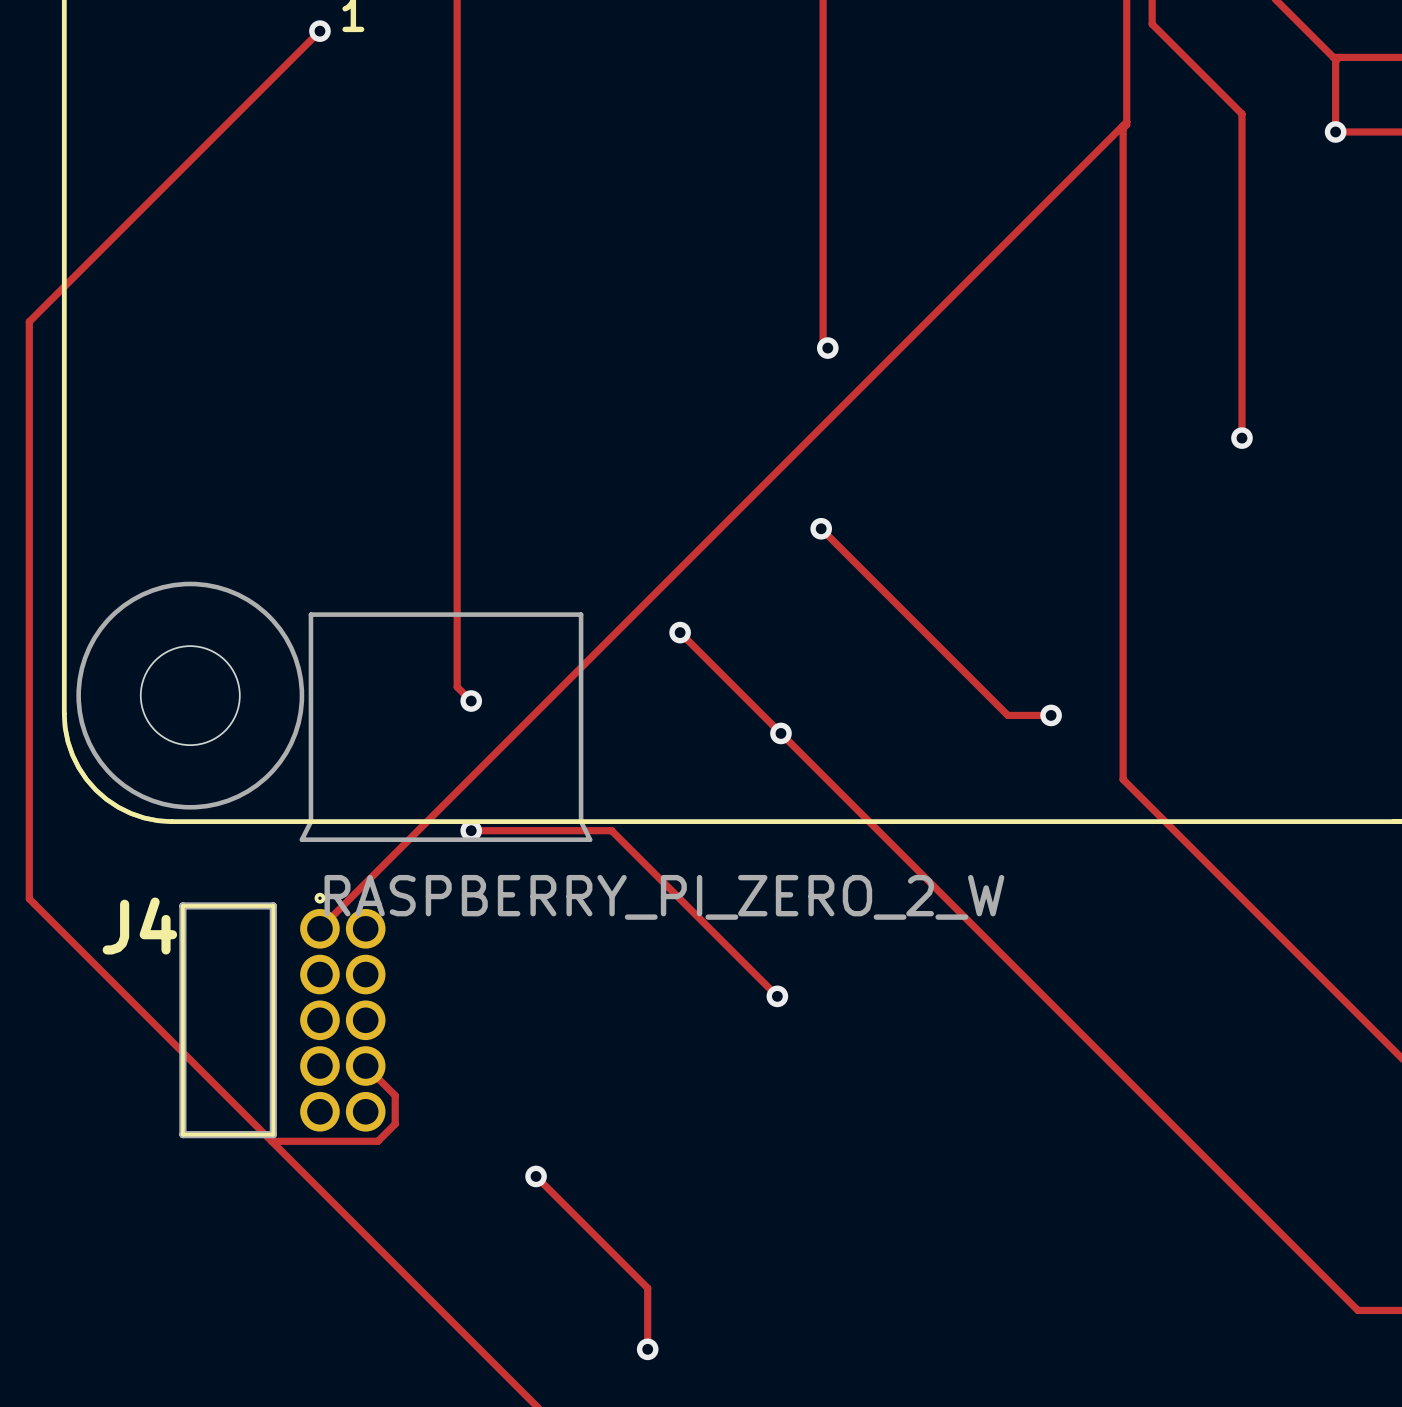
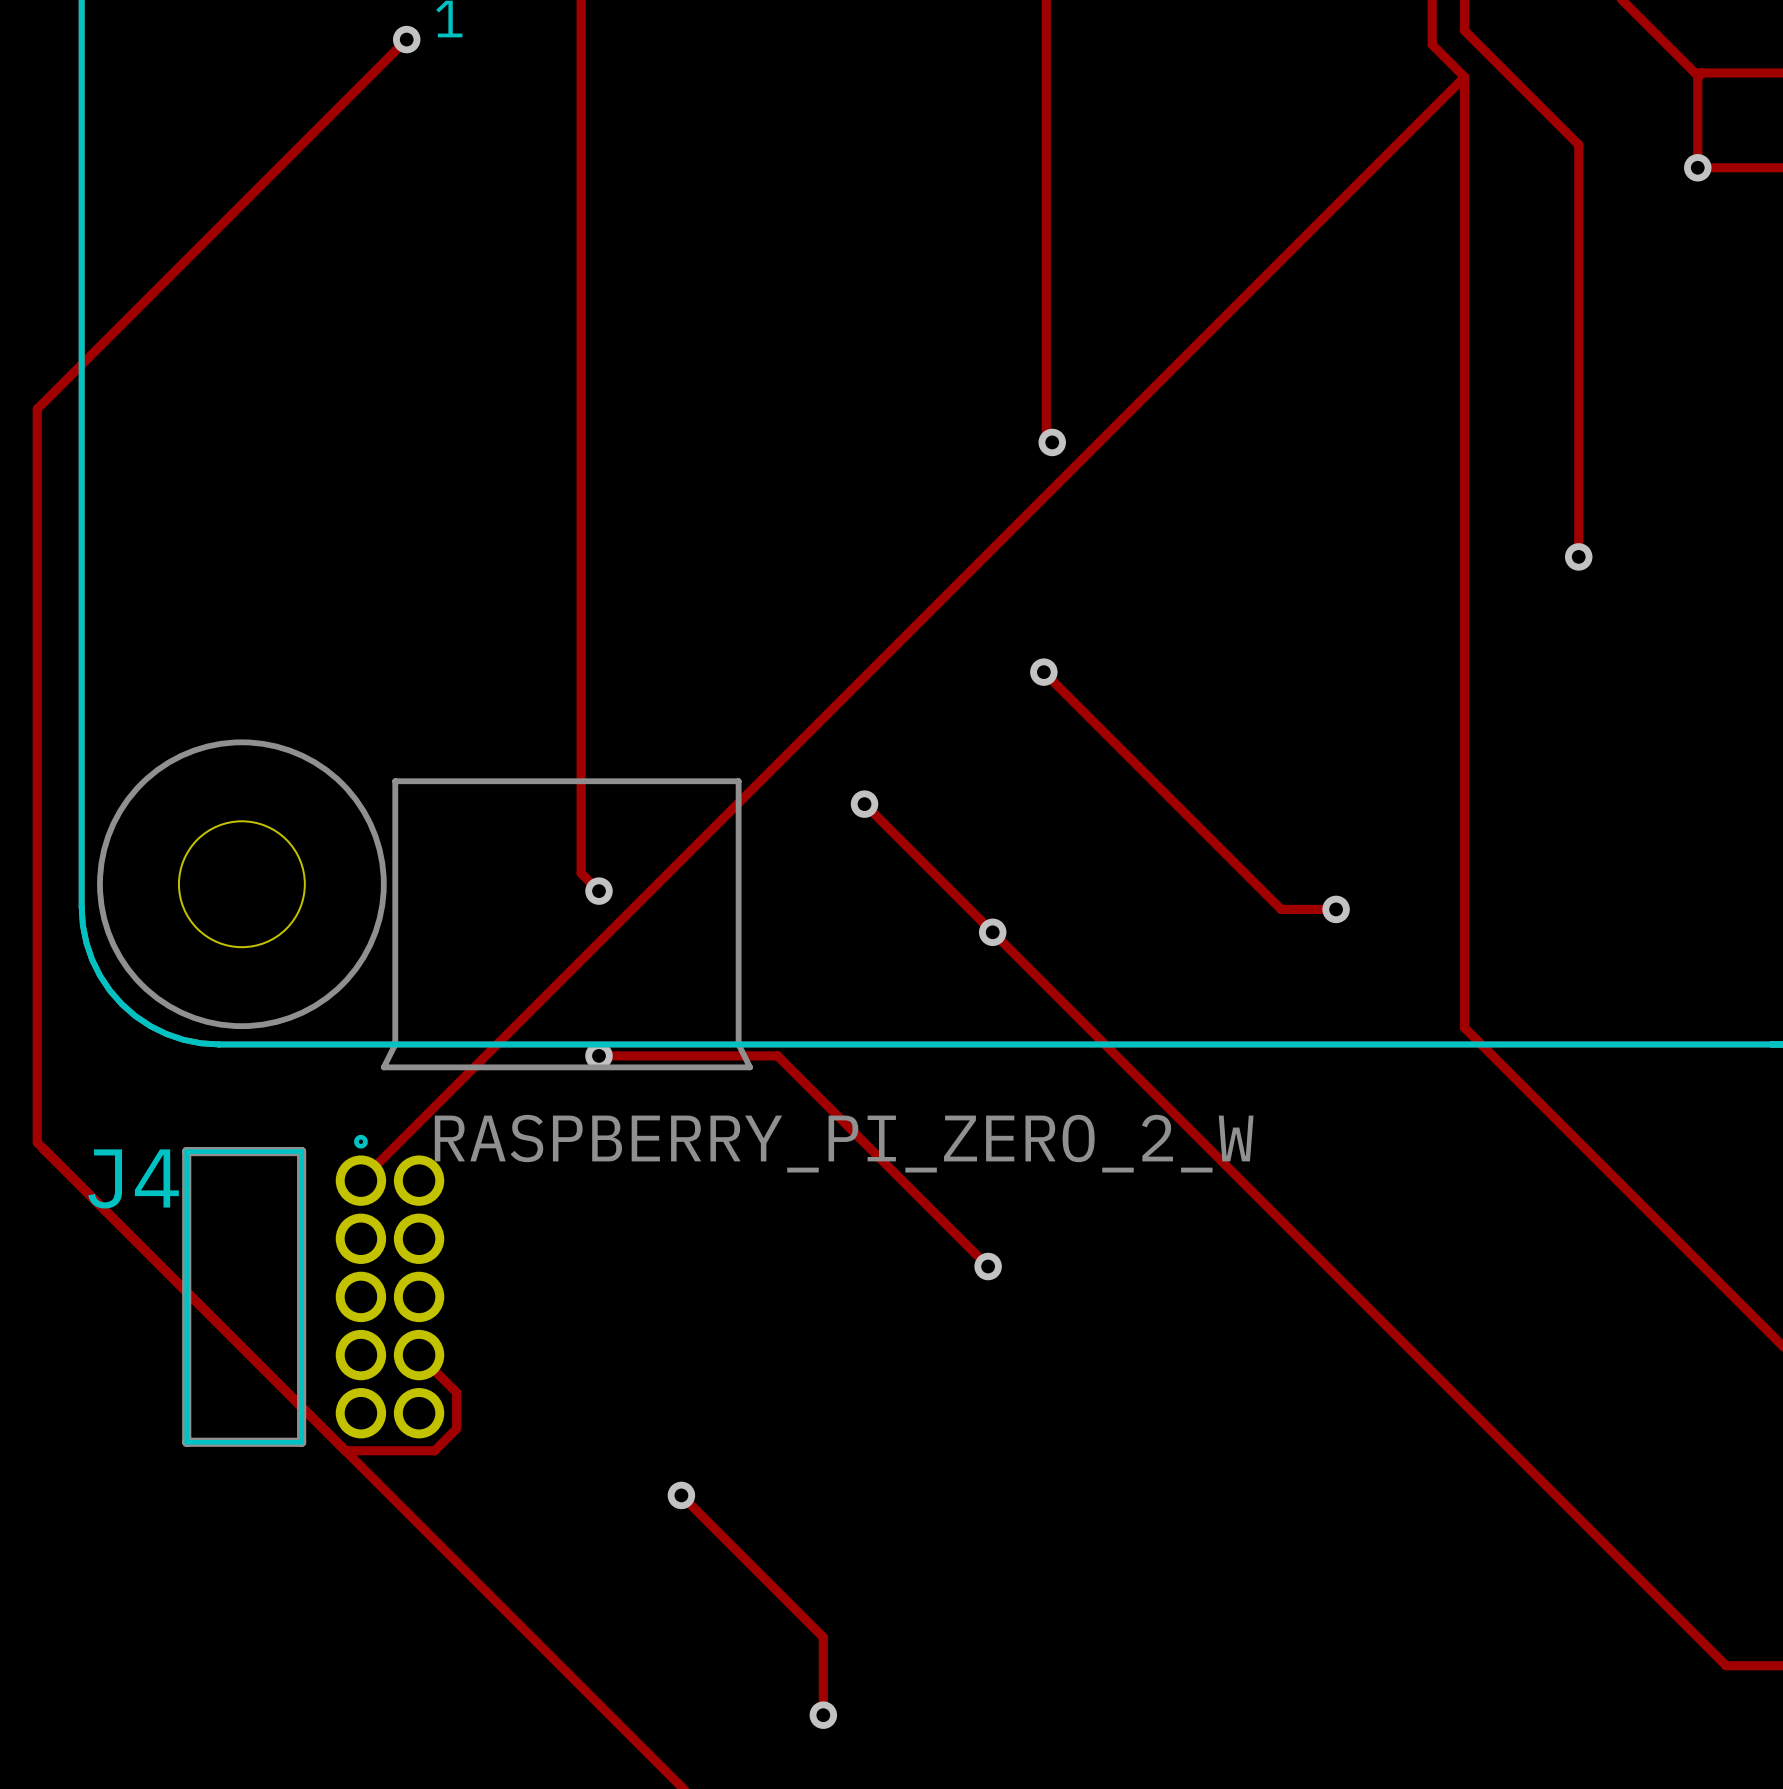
track: (1126, 35) (1126, 124) (1123, 128) -> (1432, 44) (1464, 77)
track: none -> (1464, 77) (360, 1180)
track: (1126, 122) (319, 928) -> none
track: (1123, 125) (1123, 779) (1152, 808) -> (1464, 77) (1464, 1027)
J4 position: (282, 1015) -> (313, 1290)
track: (365, 1066) (395, 1095) (395, 1124) (377, 1141) (341, 1141) -> (419, 1355) (456, 1392) (456, 1428) (434, 1450)

